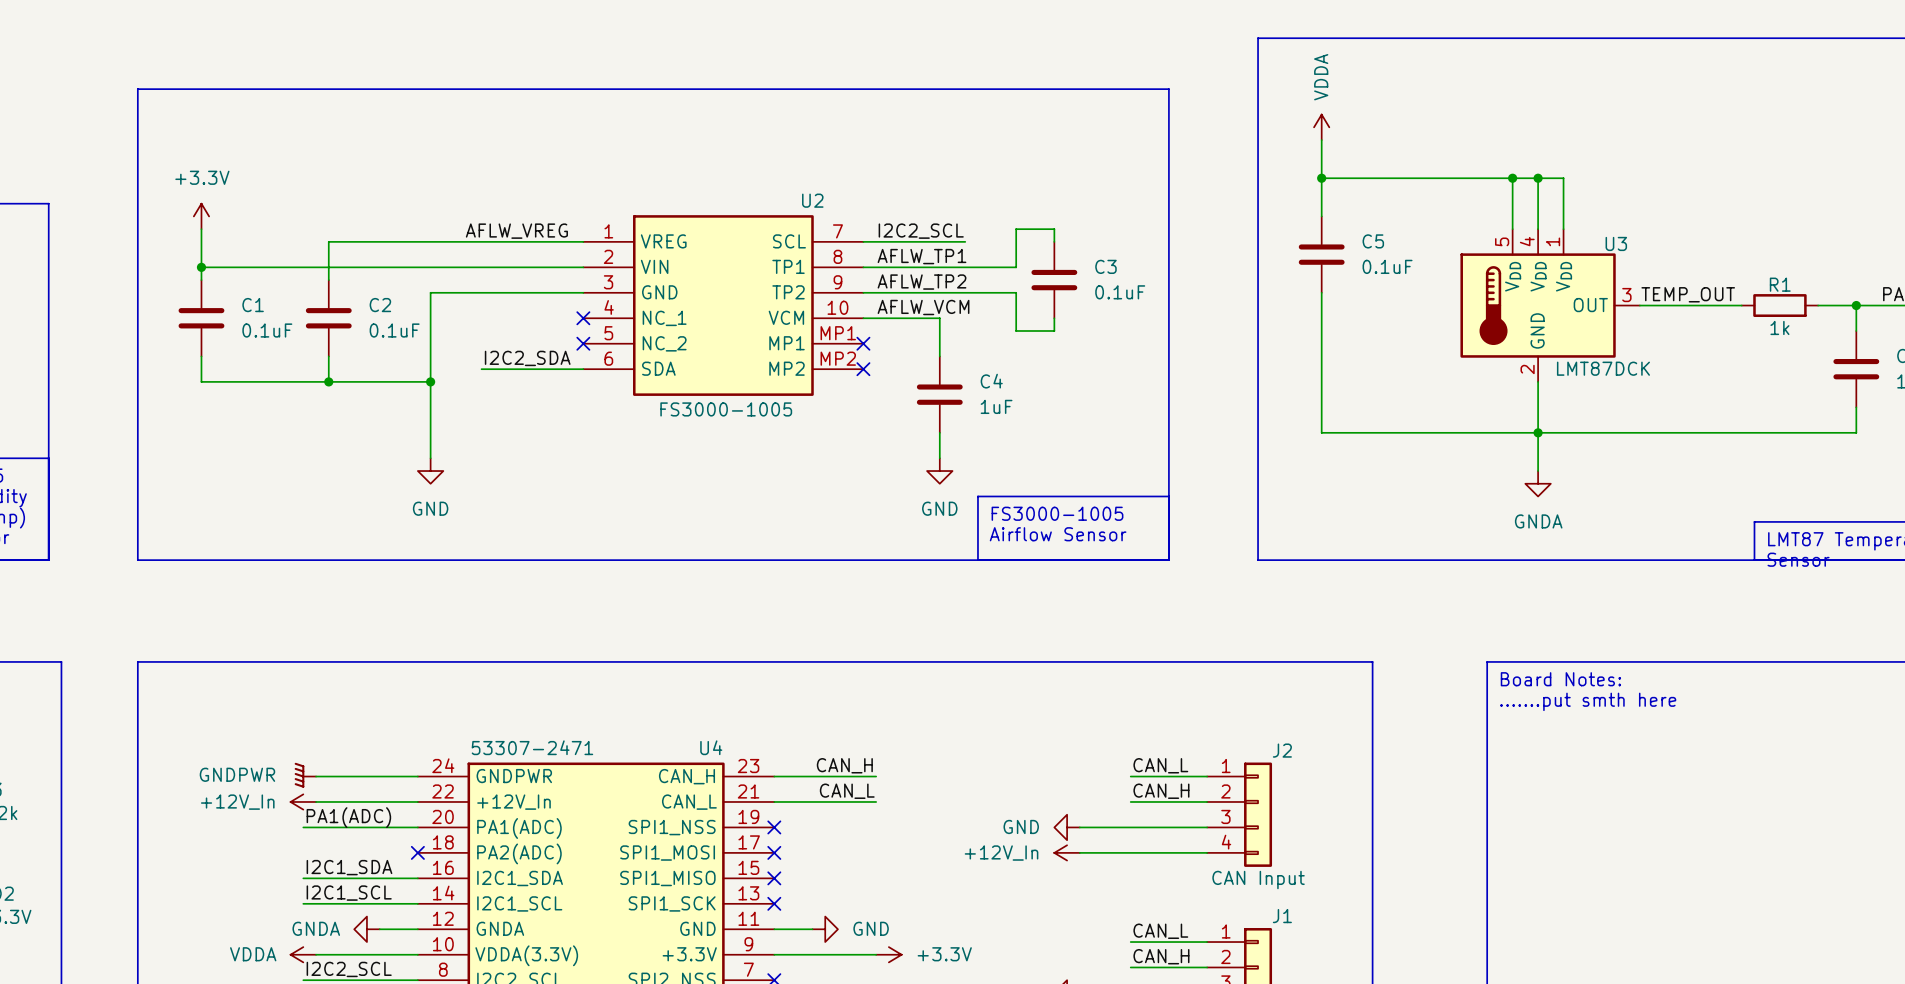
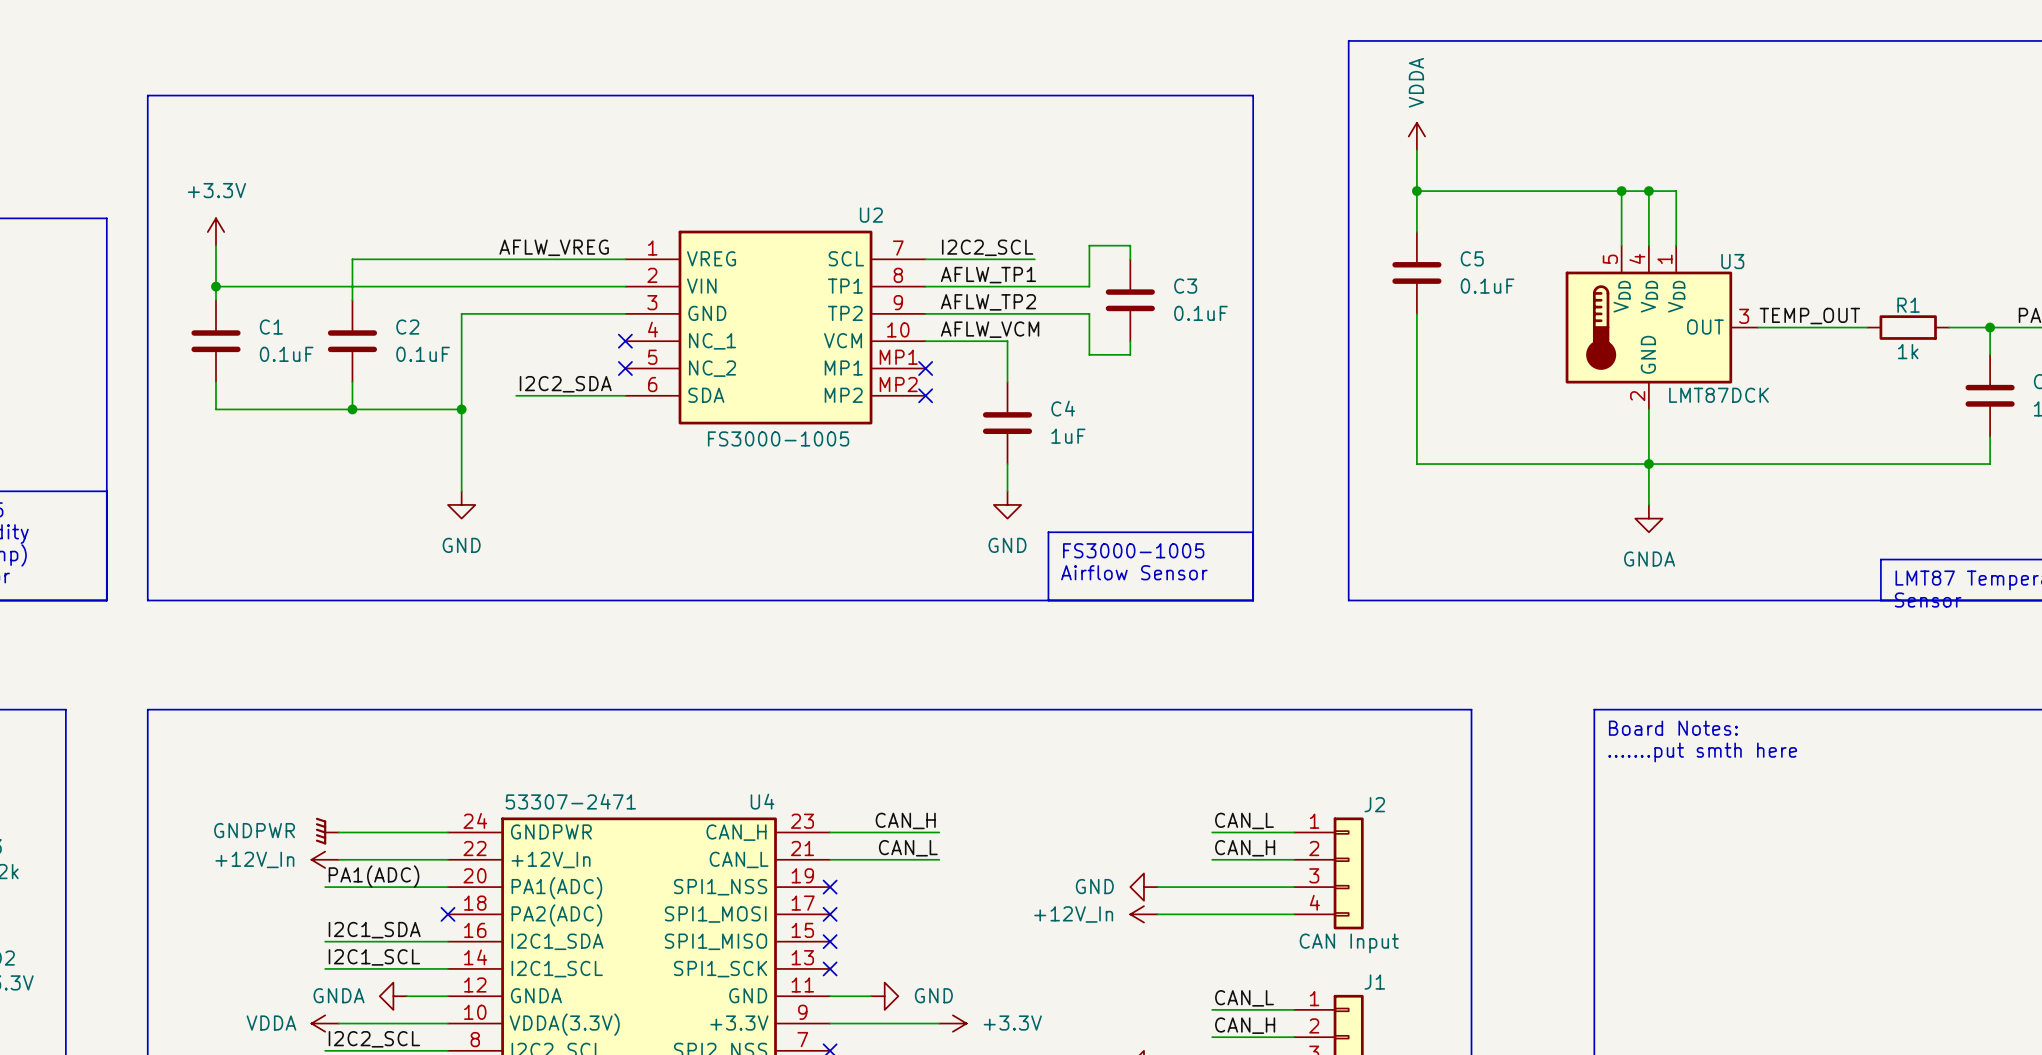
line: (48, 203) (48, 560) -> (52, 218) (106, 218) (106, 600) (52, 600)
line: none -> (52, 491) (106, 491)

